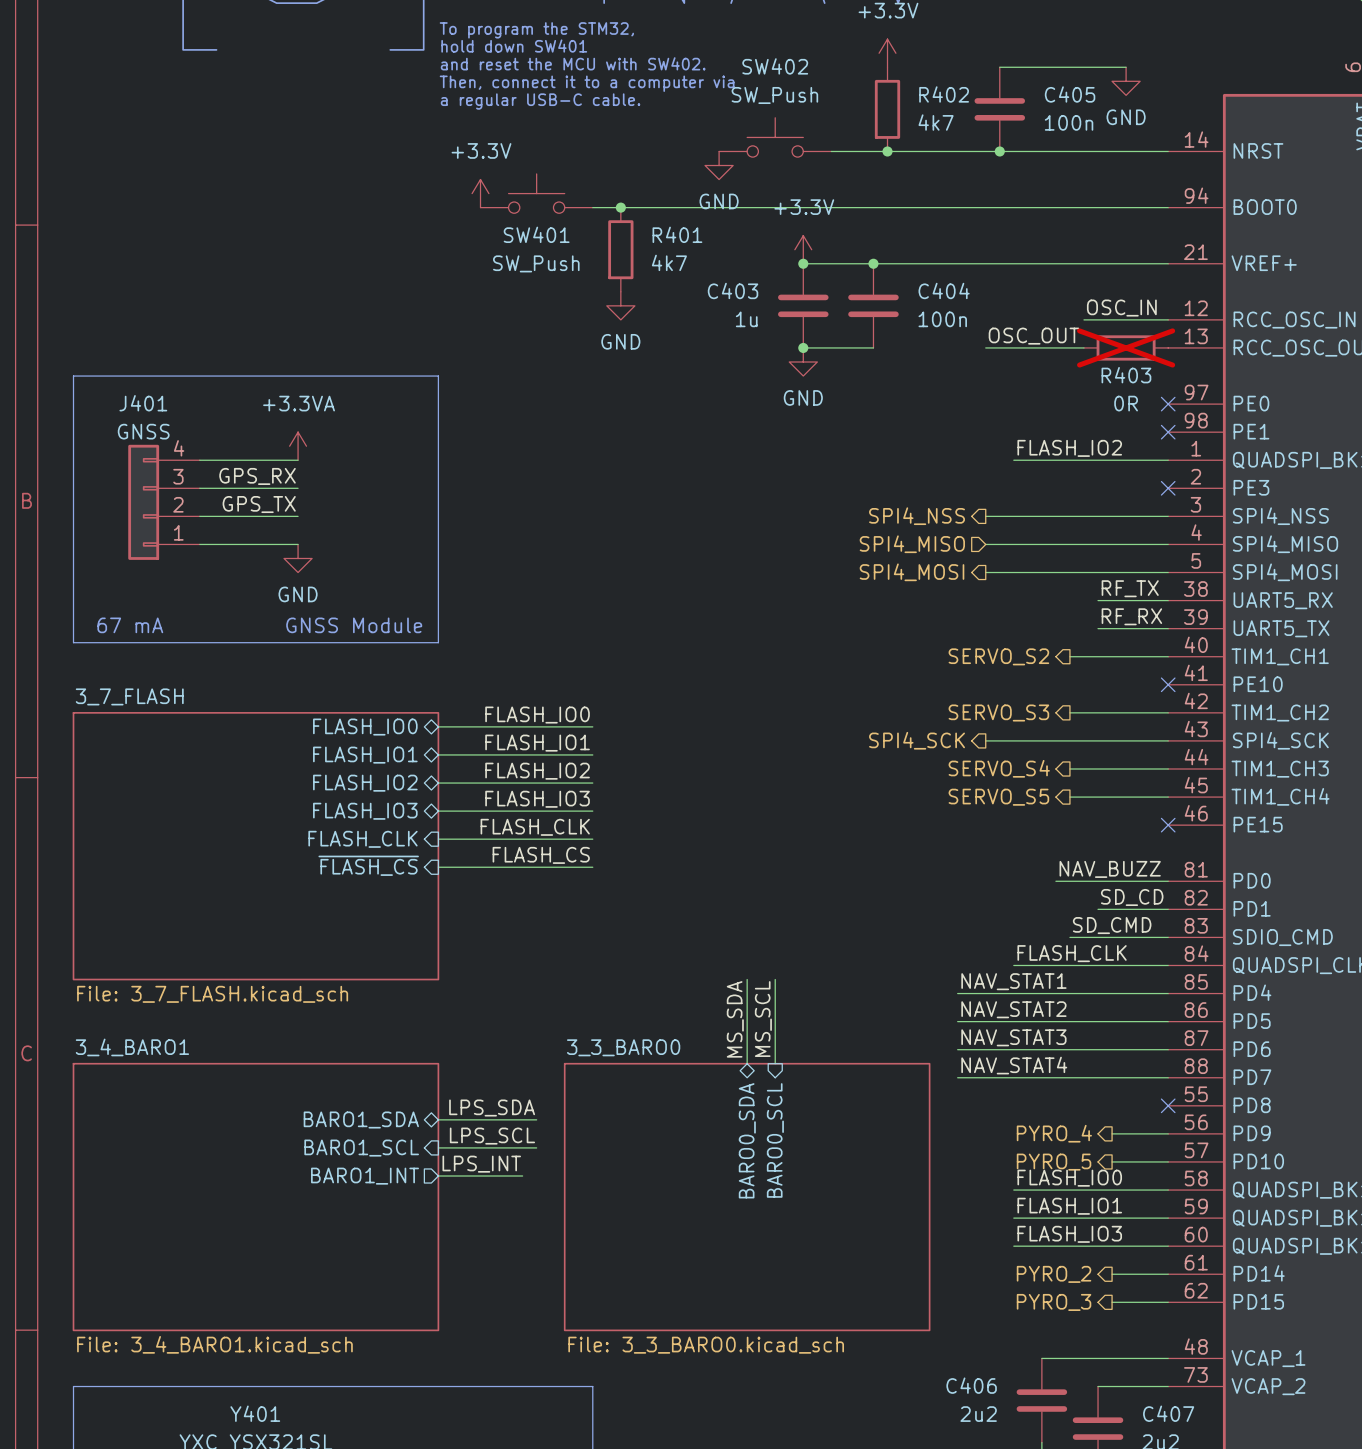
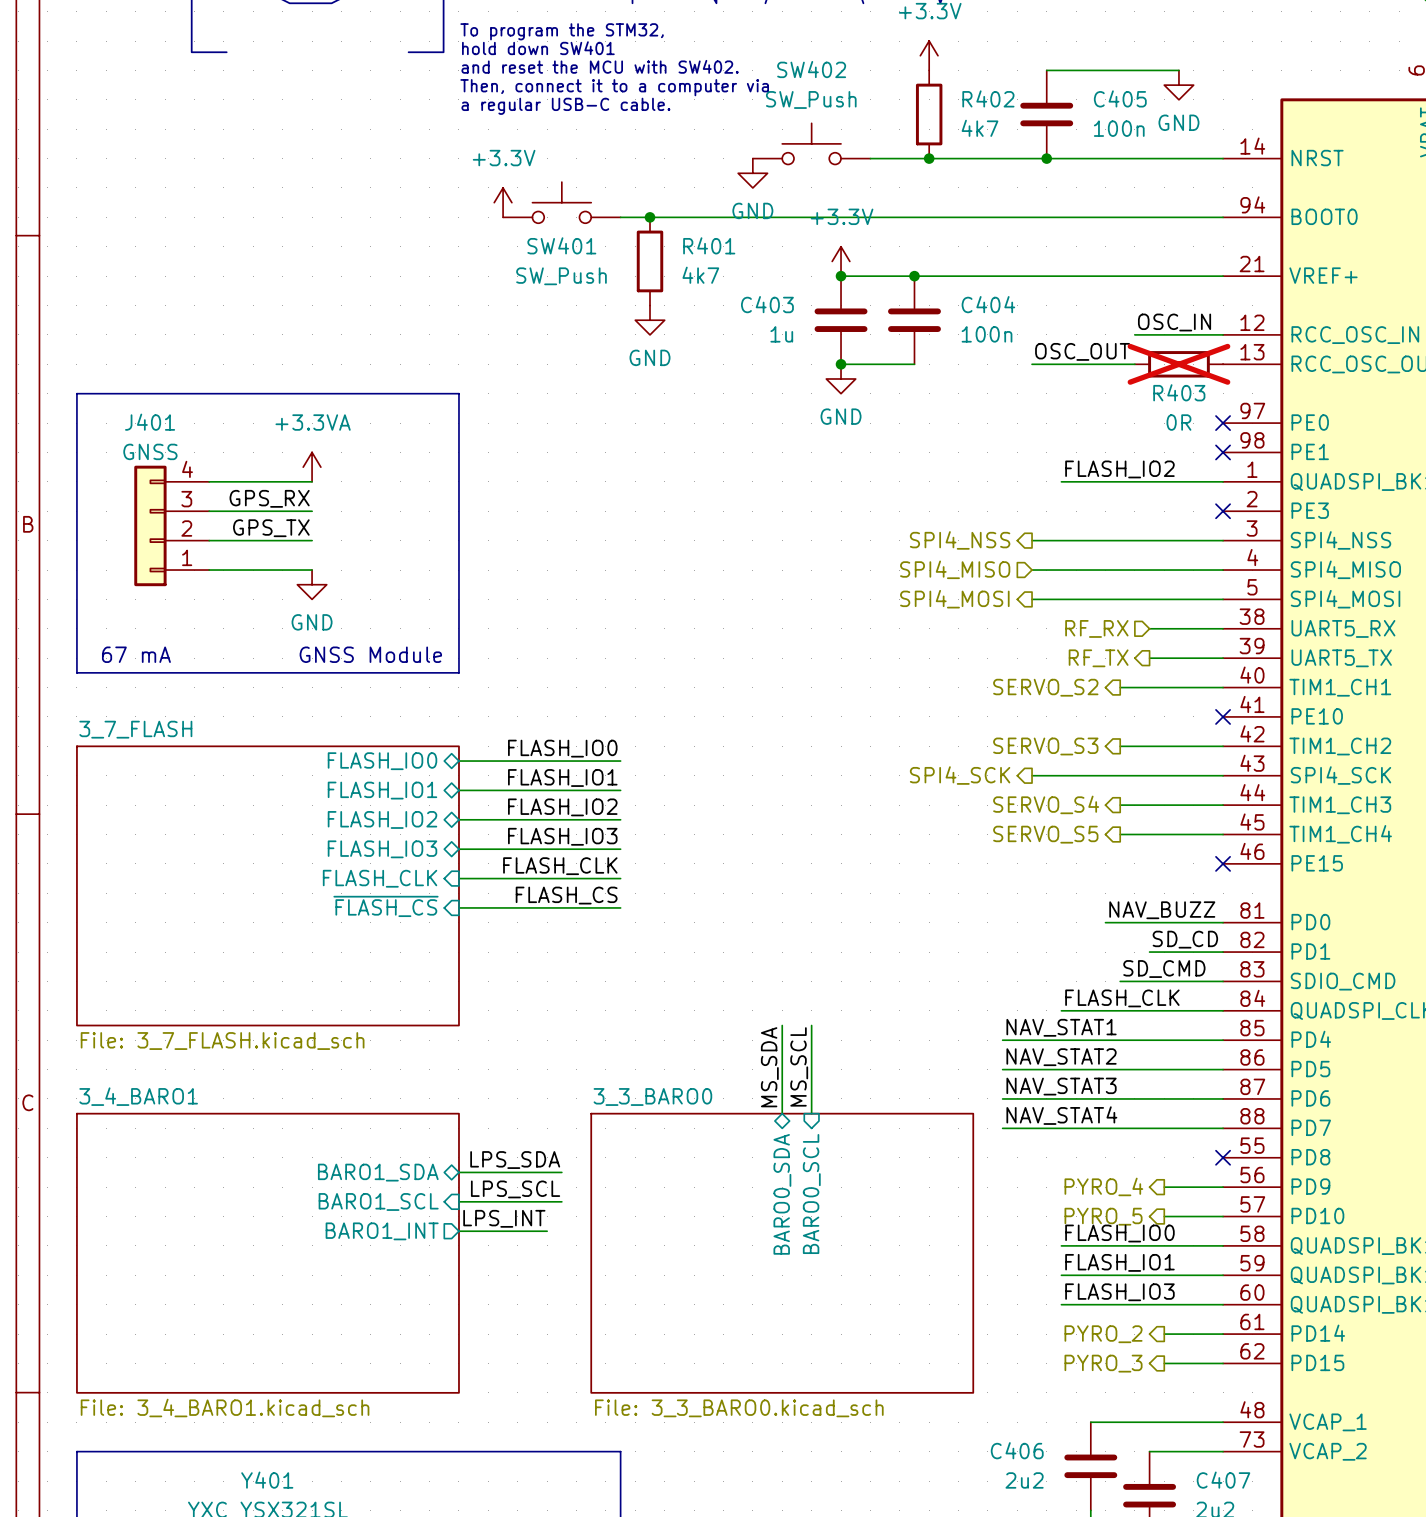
label: RF_TX (1130, 588) -> none
hierarchical label: none -> RF_RX (1096, 628)
label: RF_RX (1131, 616) -> none
hierarchical label: none -> RF_TX (1098, 658)

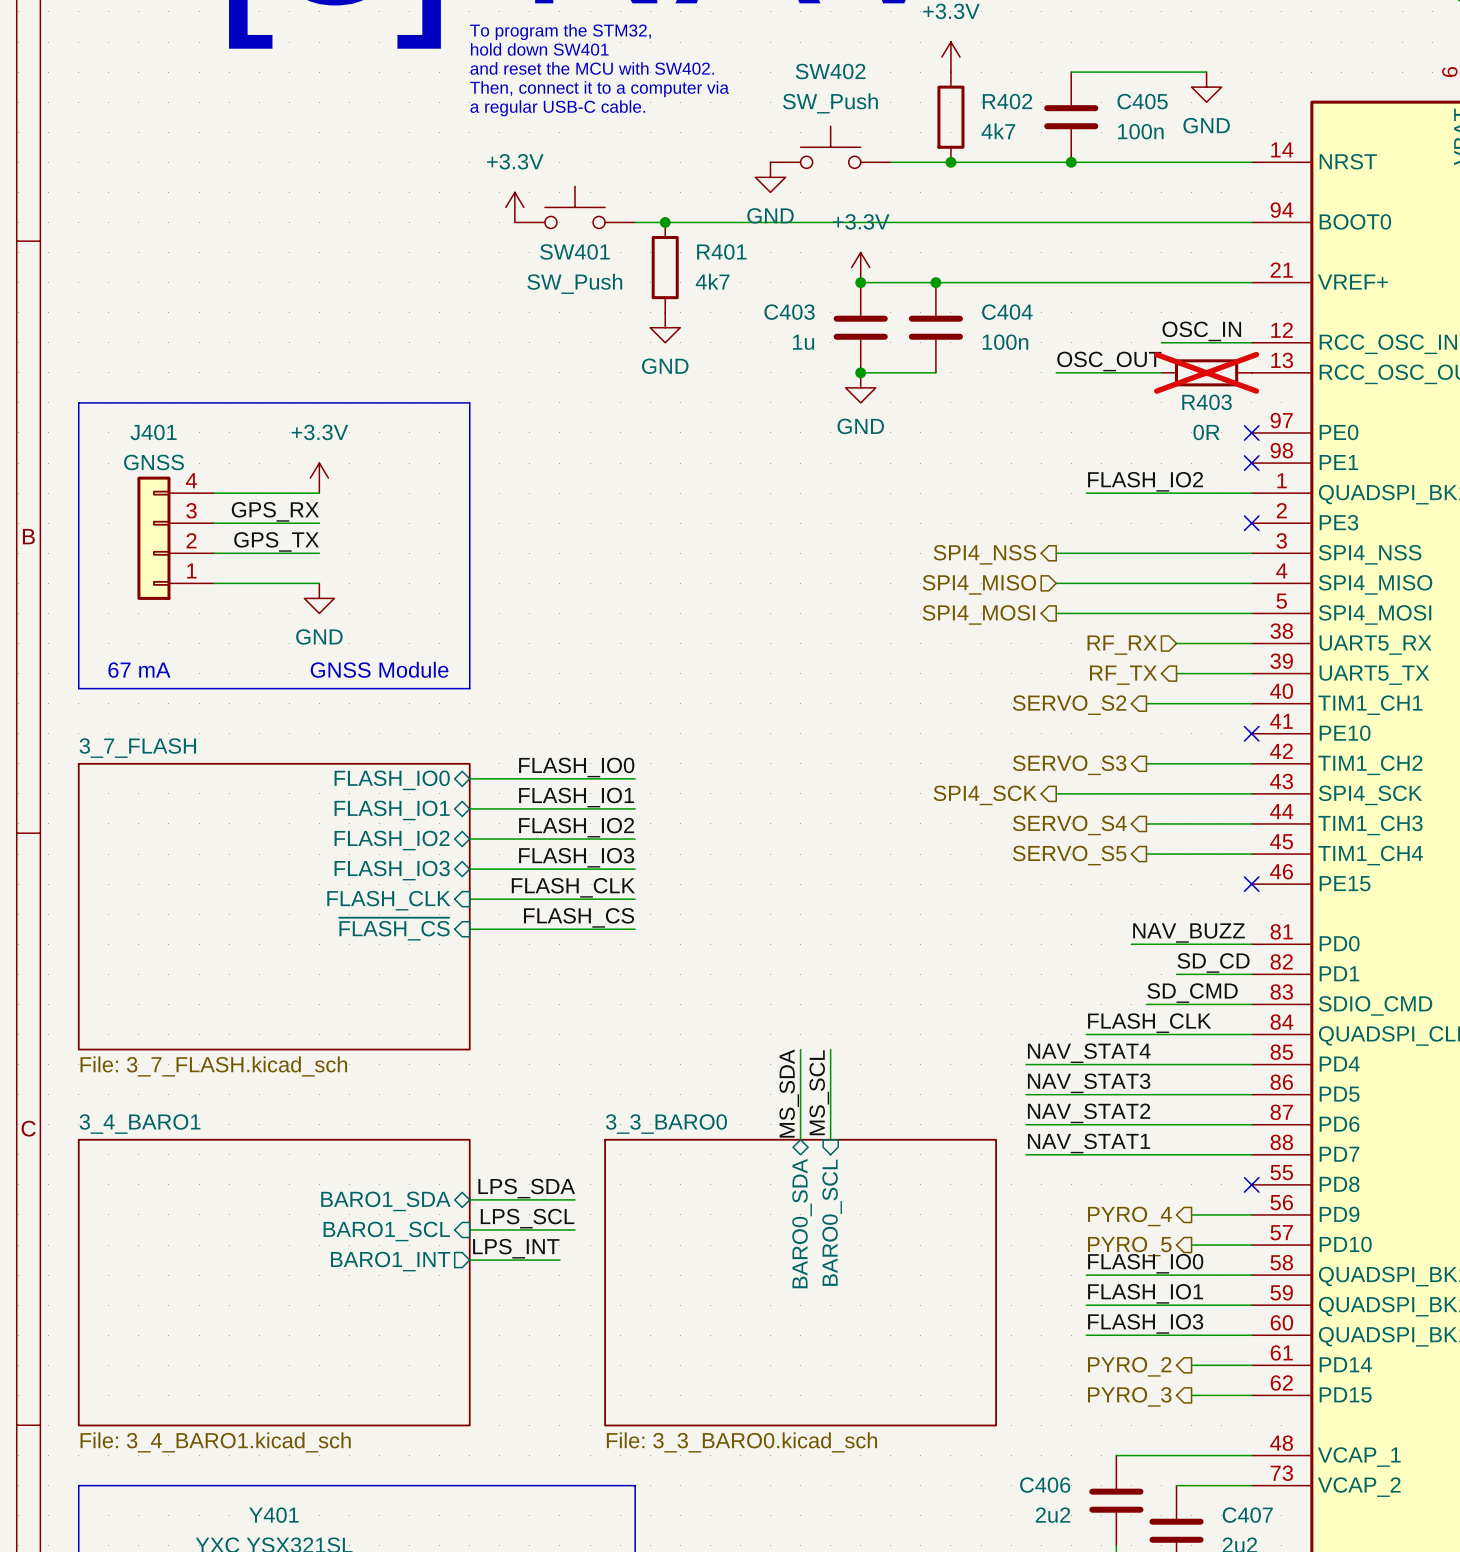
power symbol: +3.3VA (312, 467) -> +3.3V (319, 478)
label: NAV_STAT1 (1061, 1027) -> NAV_STAT4 (1089, 1053)
label: NAV_STAT2 (1061, 1057) -> NAV_STAT3 (1089, 1083)
label: NAV_STAT3 (1061, 1086) -> NAV_STAT2 (1089, 1113)
label: NAV_STAT4 (1061, 1115) -> NAV_STAT1 (1089, 1143)

